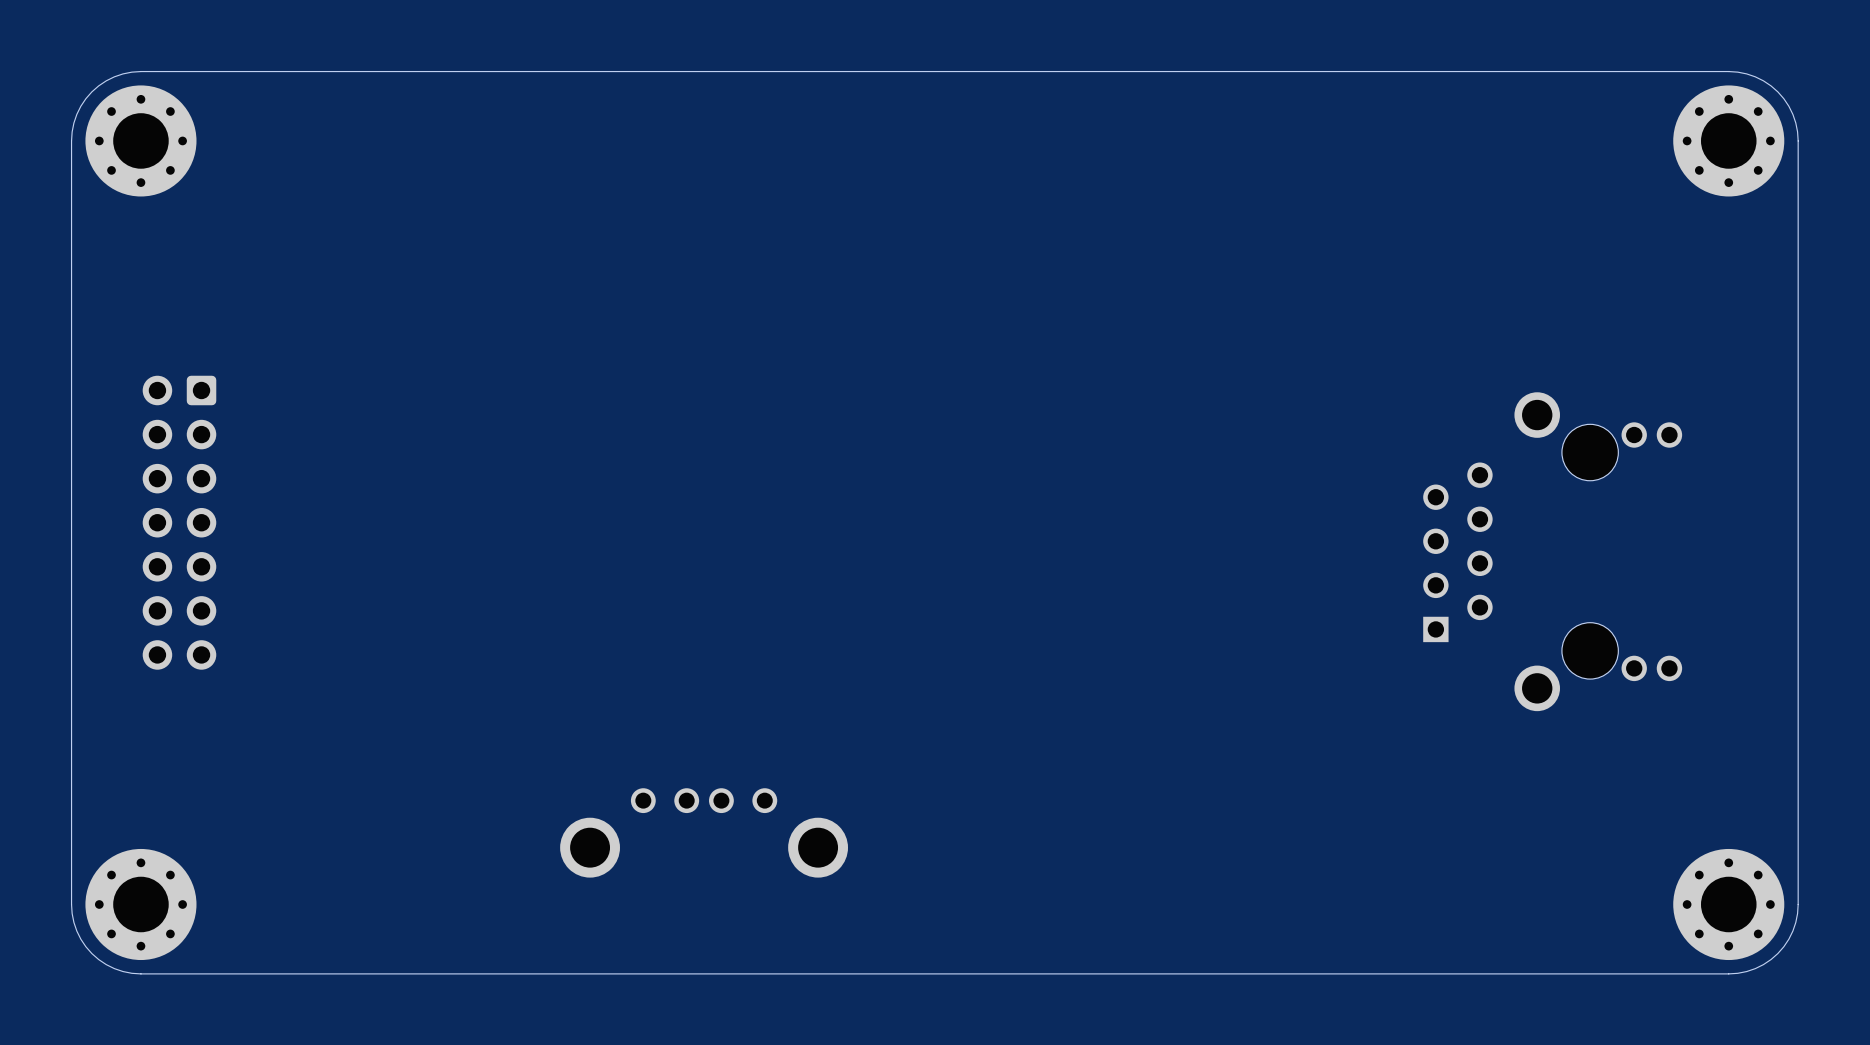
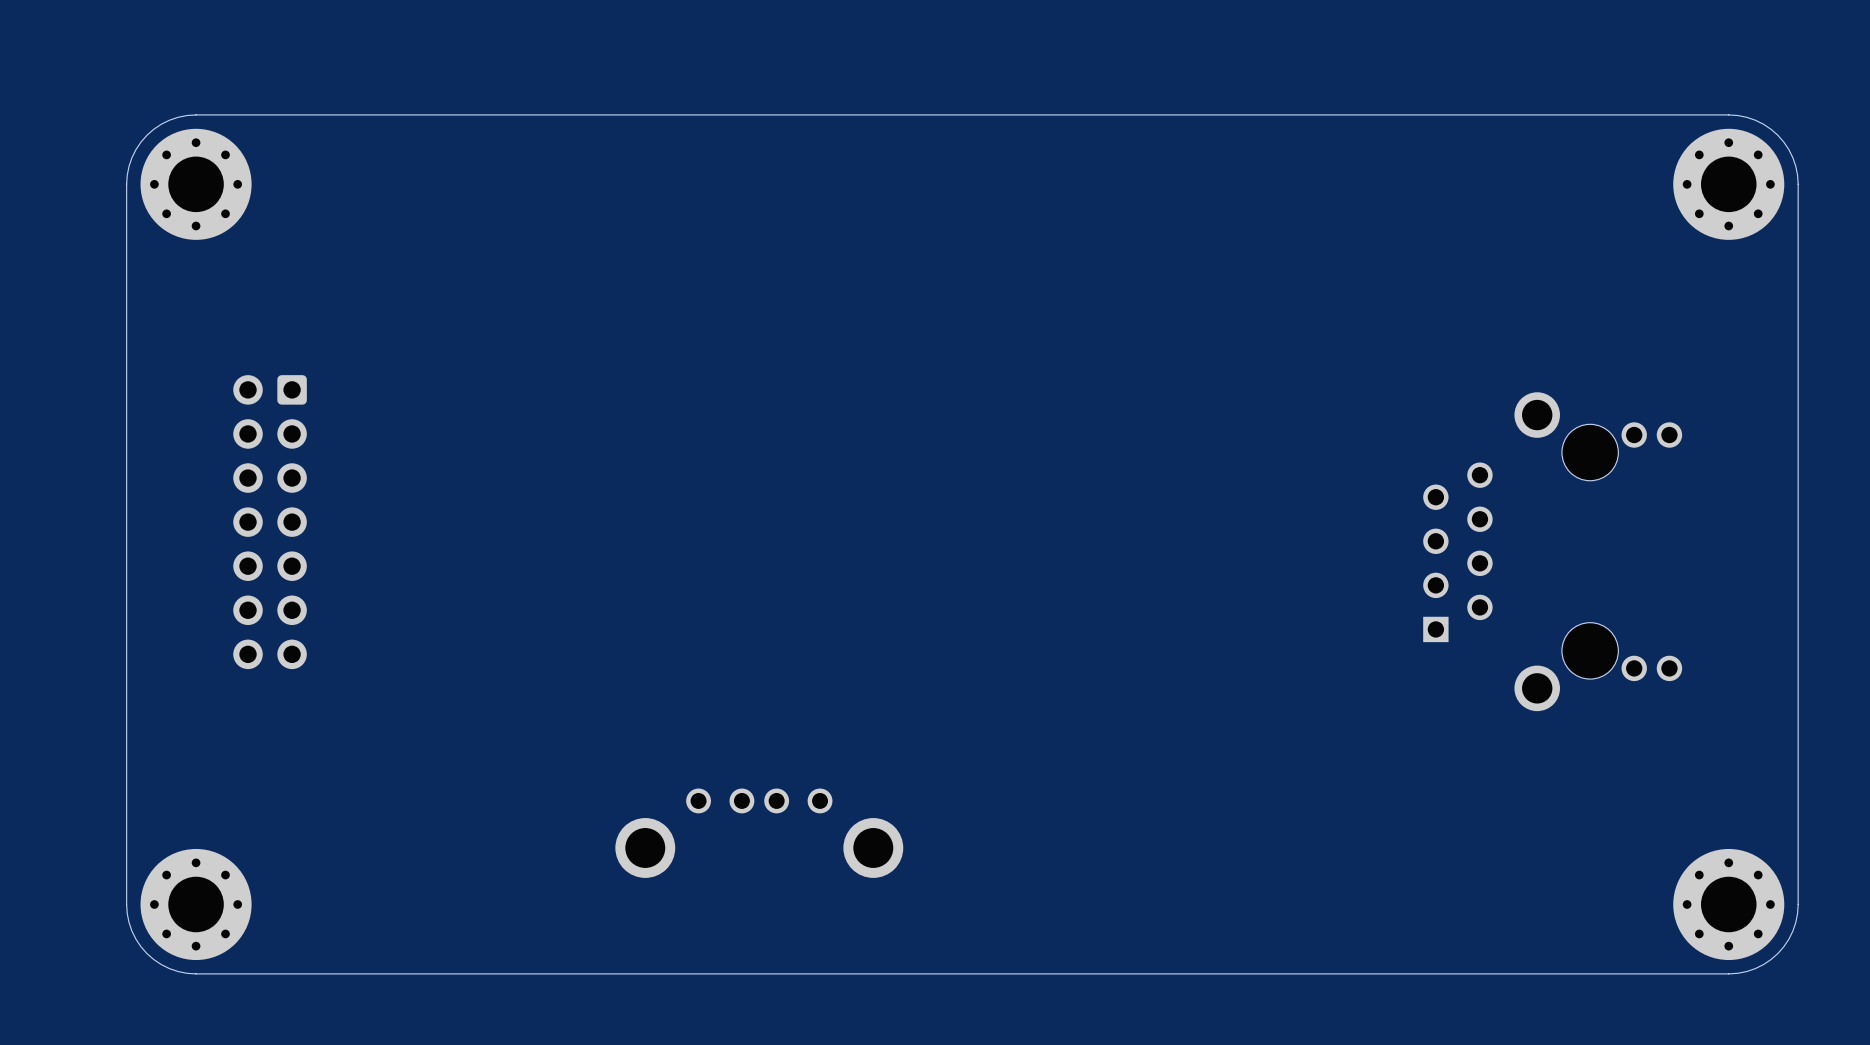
part position: (140, 140) -> (196, 184)
part position: (1728, 140) -> (1728, 184)
board edge: (1798, 184) (1797, 131) (1788, 106) (1777, 91) (1763, 80) (1746, 73) (1728, 71) (140, 71) (114, 76) (98, 85) (85, 98) (76, 114) (71, 140) (72, 913) (76, 931) (85, 946) (98, 959) (114, 968) (140, 973) (196, 973) -> (1798, 184) (1792, 157) (1777, 135) (1755, 120) (1728, 114) (196, 114) (169, 120) (153, 129) (140, 142) (131, 157) (126, 184) (126, 904) (131, 931) (146, 953) (169, 968) (196, 973)
part position: (179, 522) -> (270, 522)
part position: (704, 832) -> (759, 833)
part position: (140, 904) -> (196, 904)

